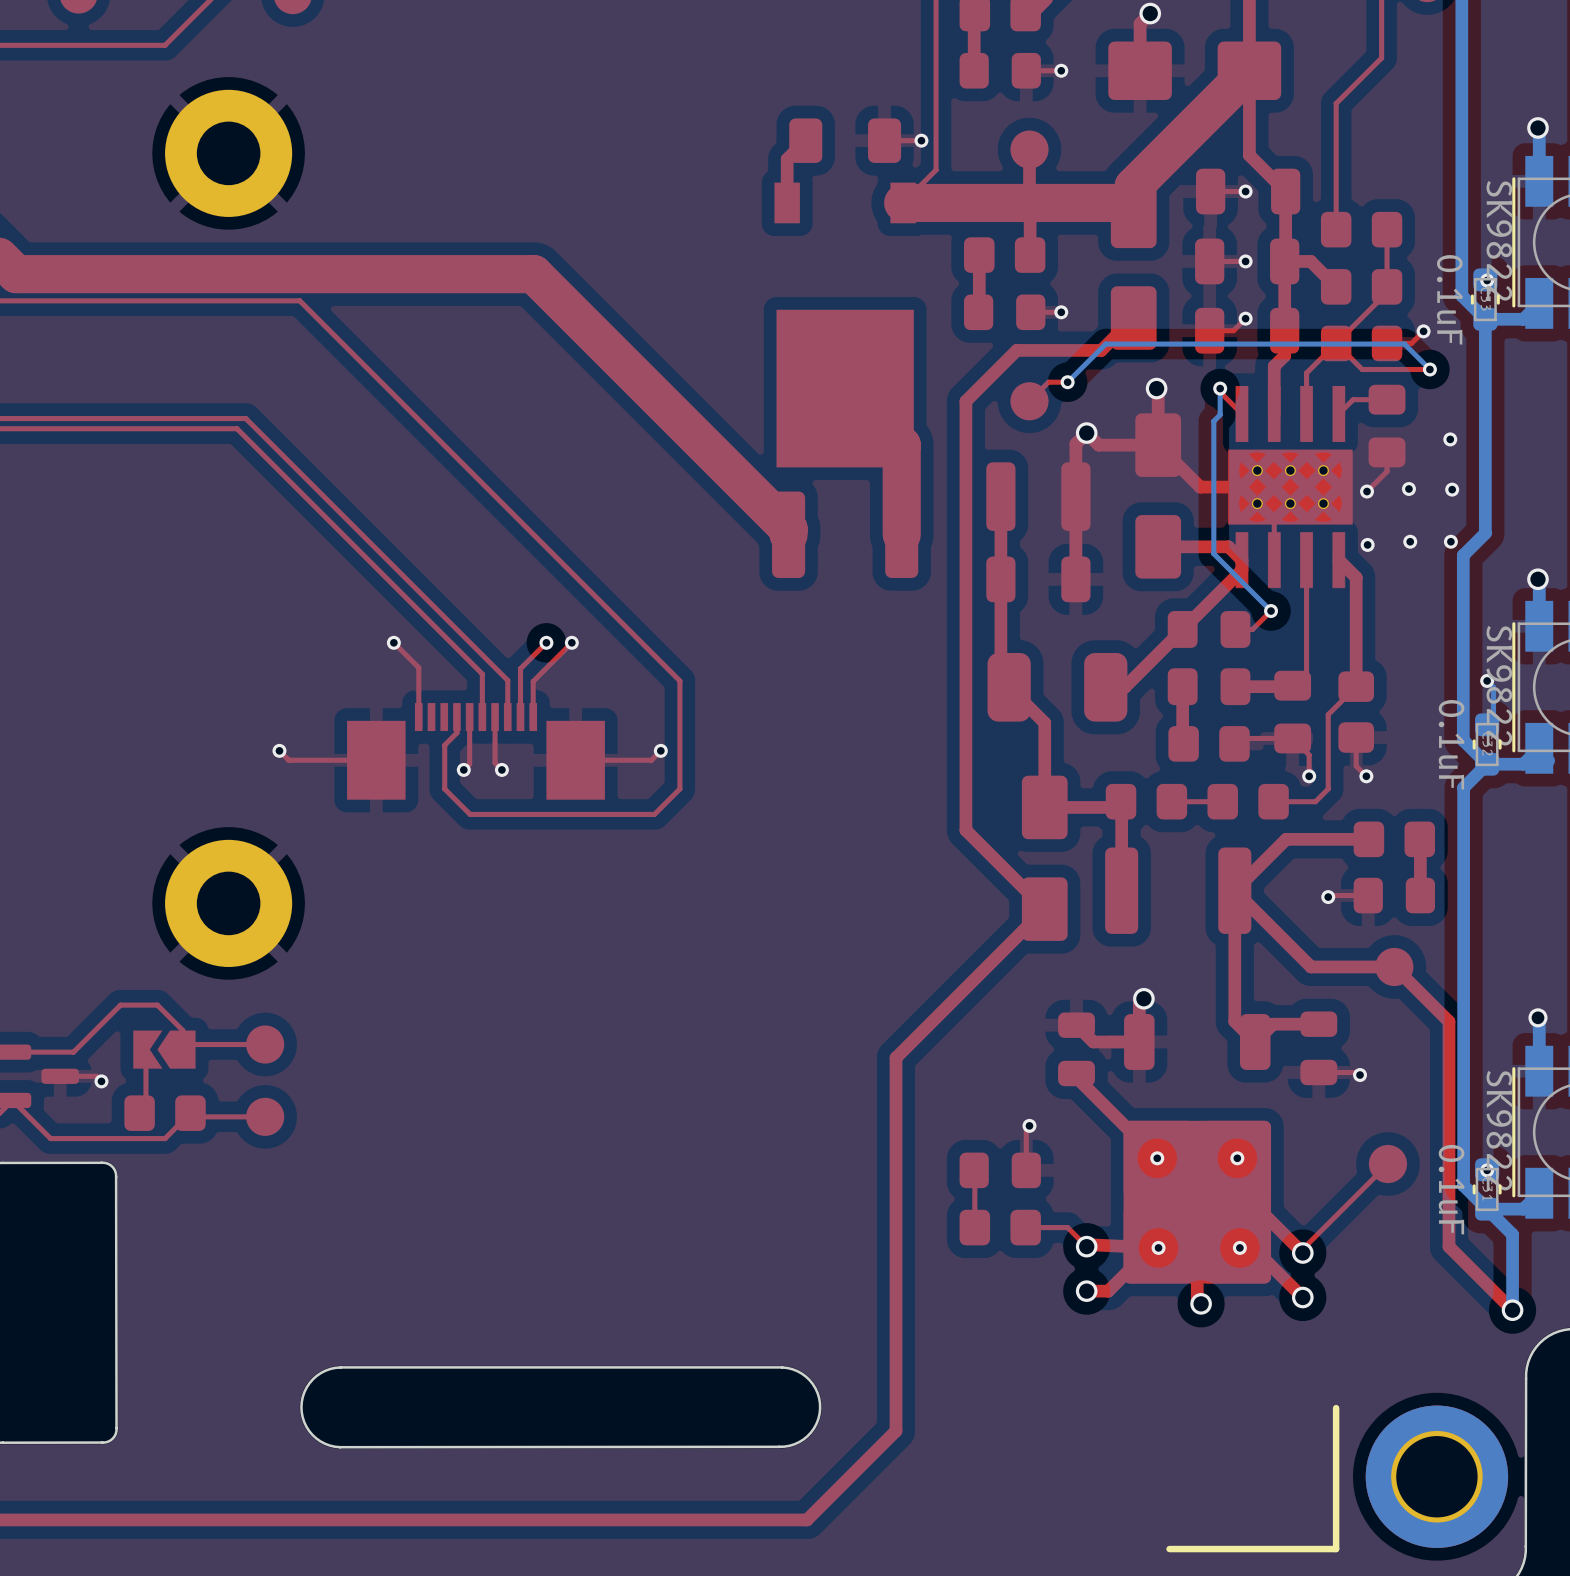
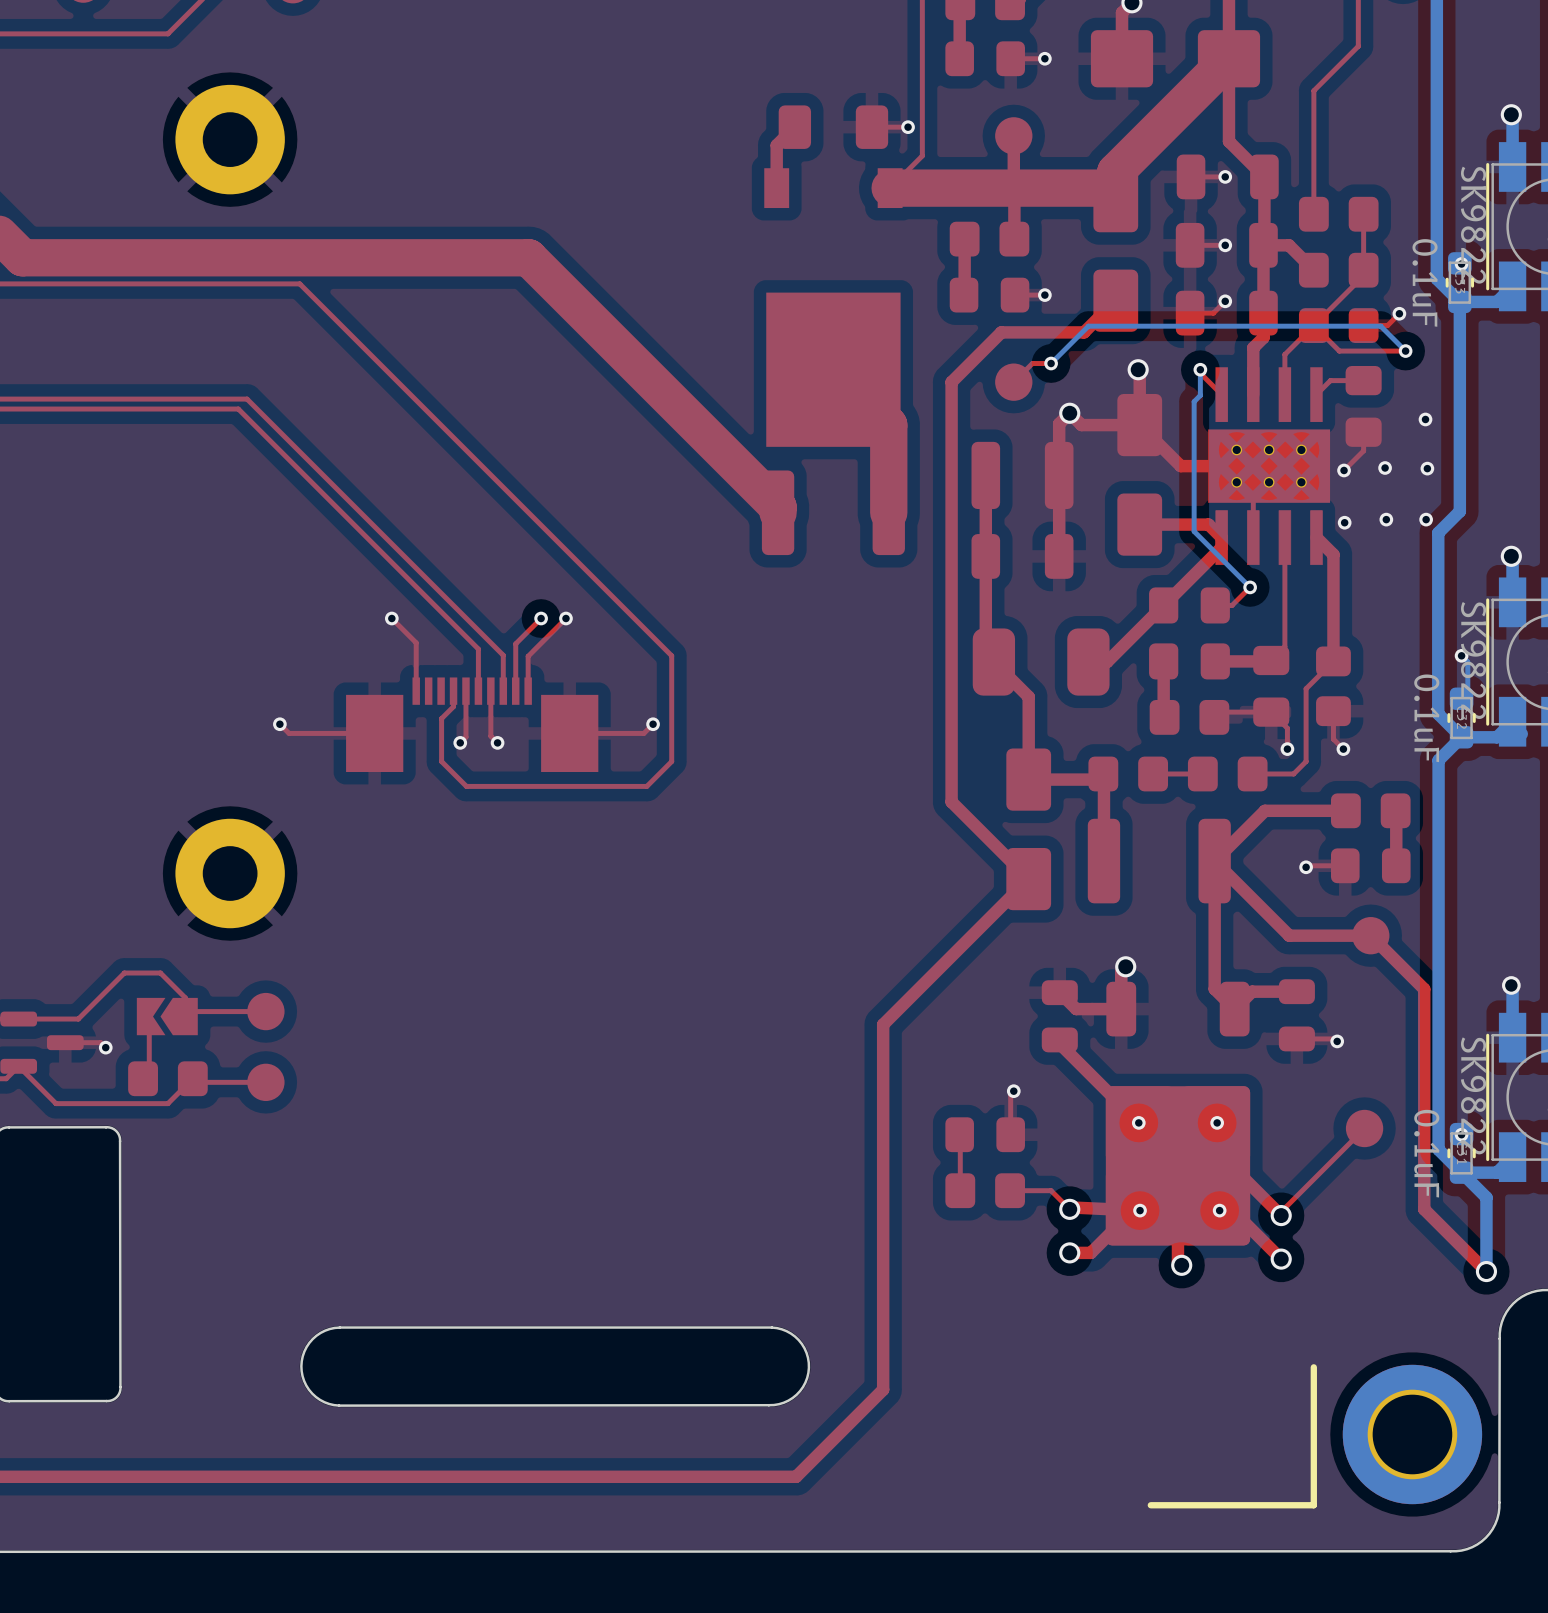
part footprint: [165, 89, 293, 217] -> [175, 84, 285, 195]
part footprint: [165, 839, 293, 967] -> [175, 818, 285, 929]

